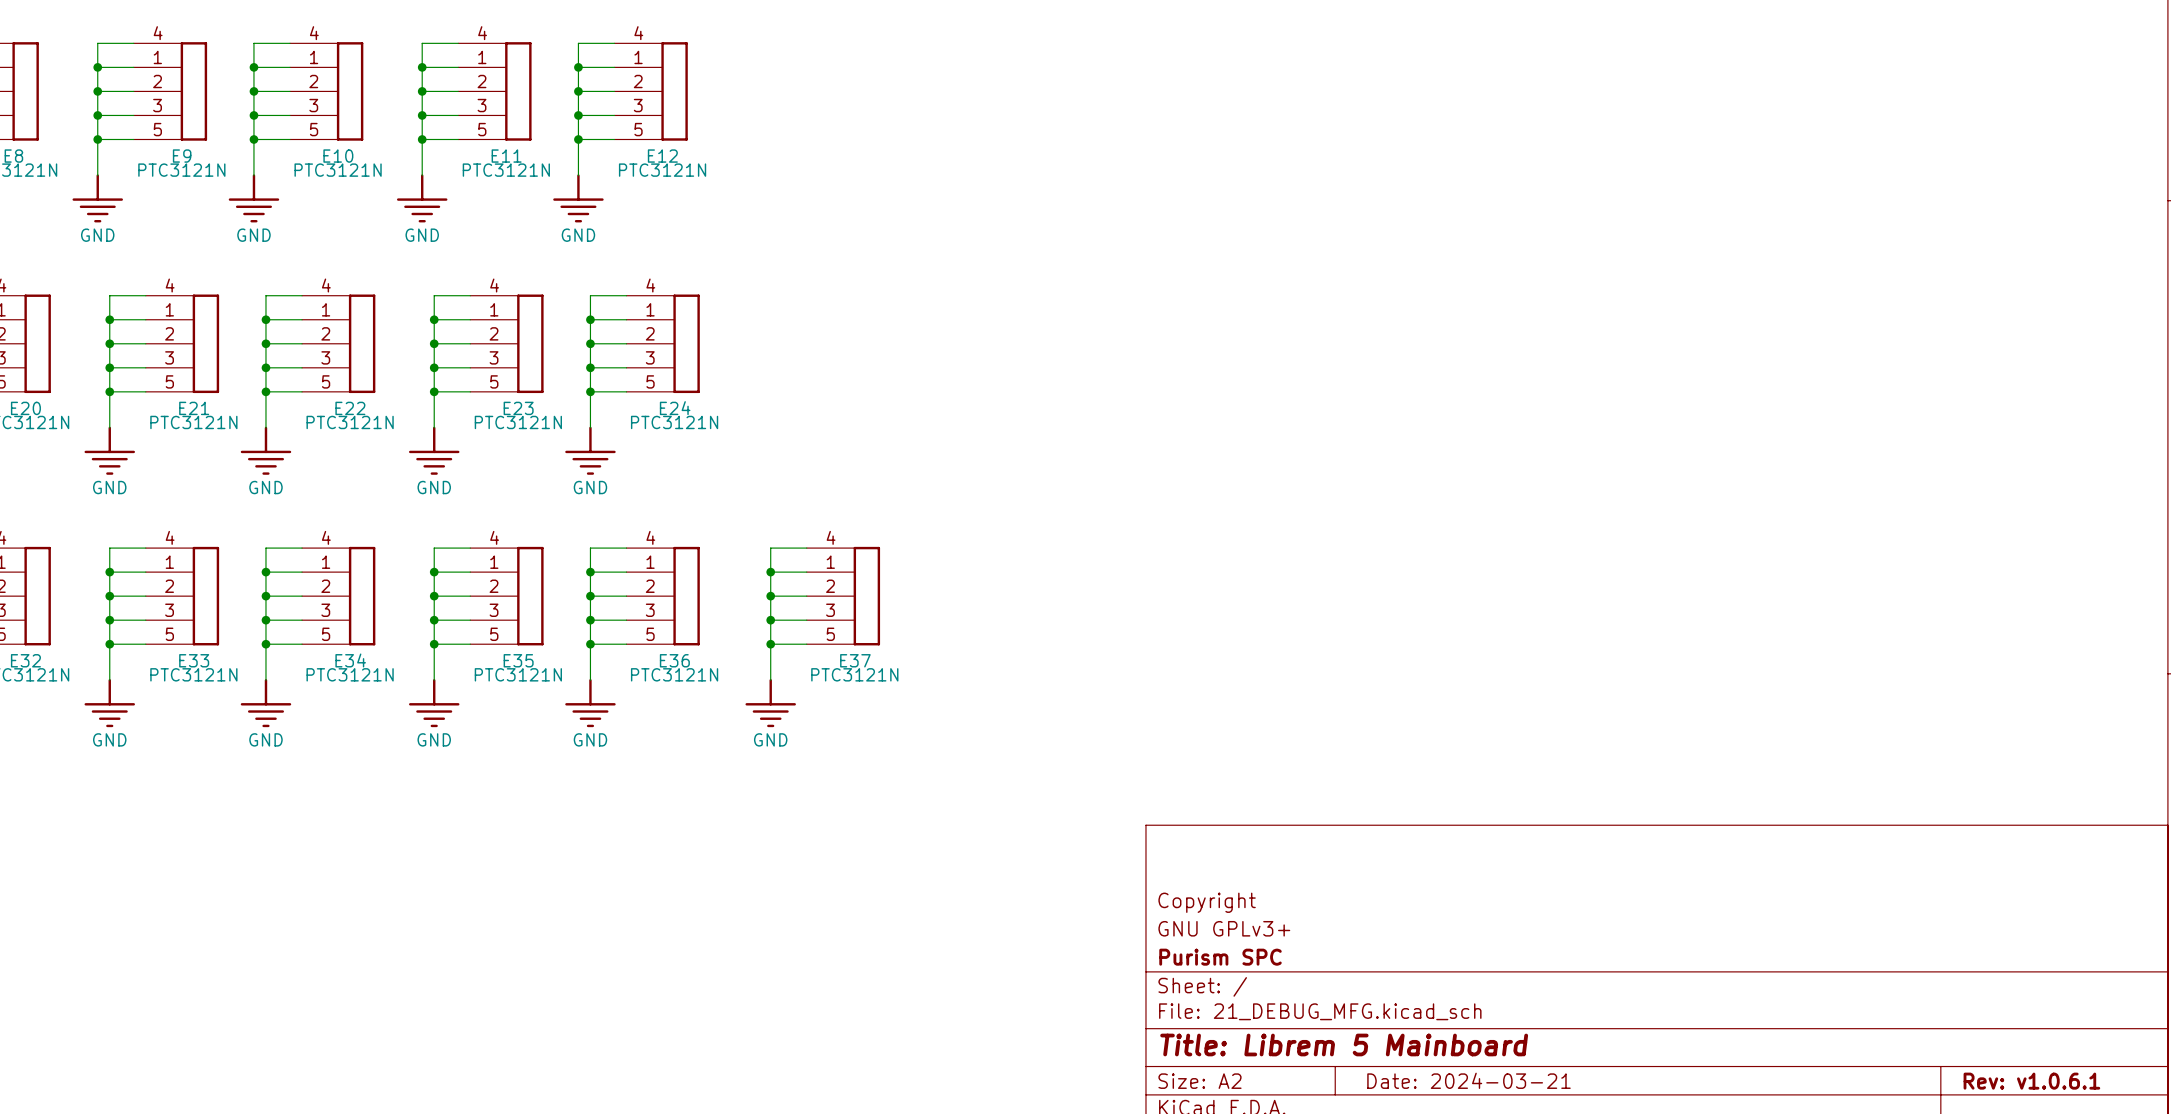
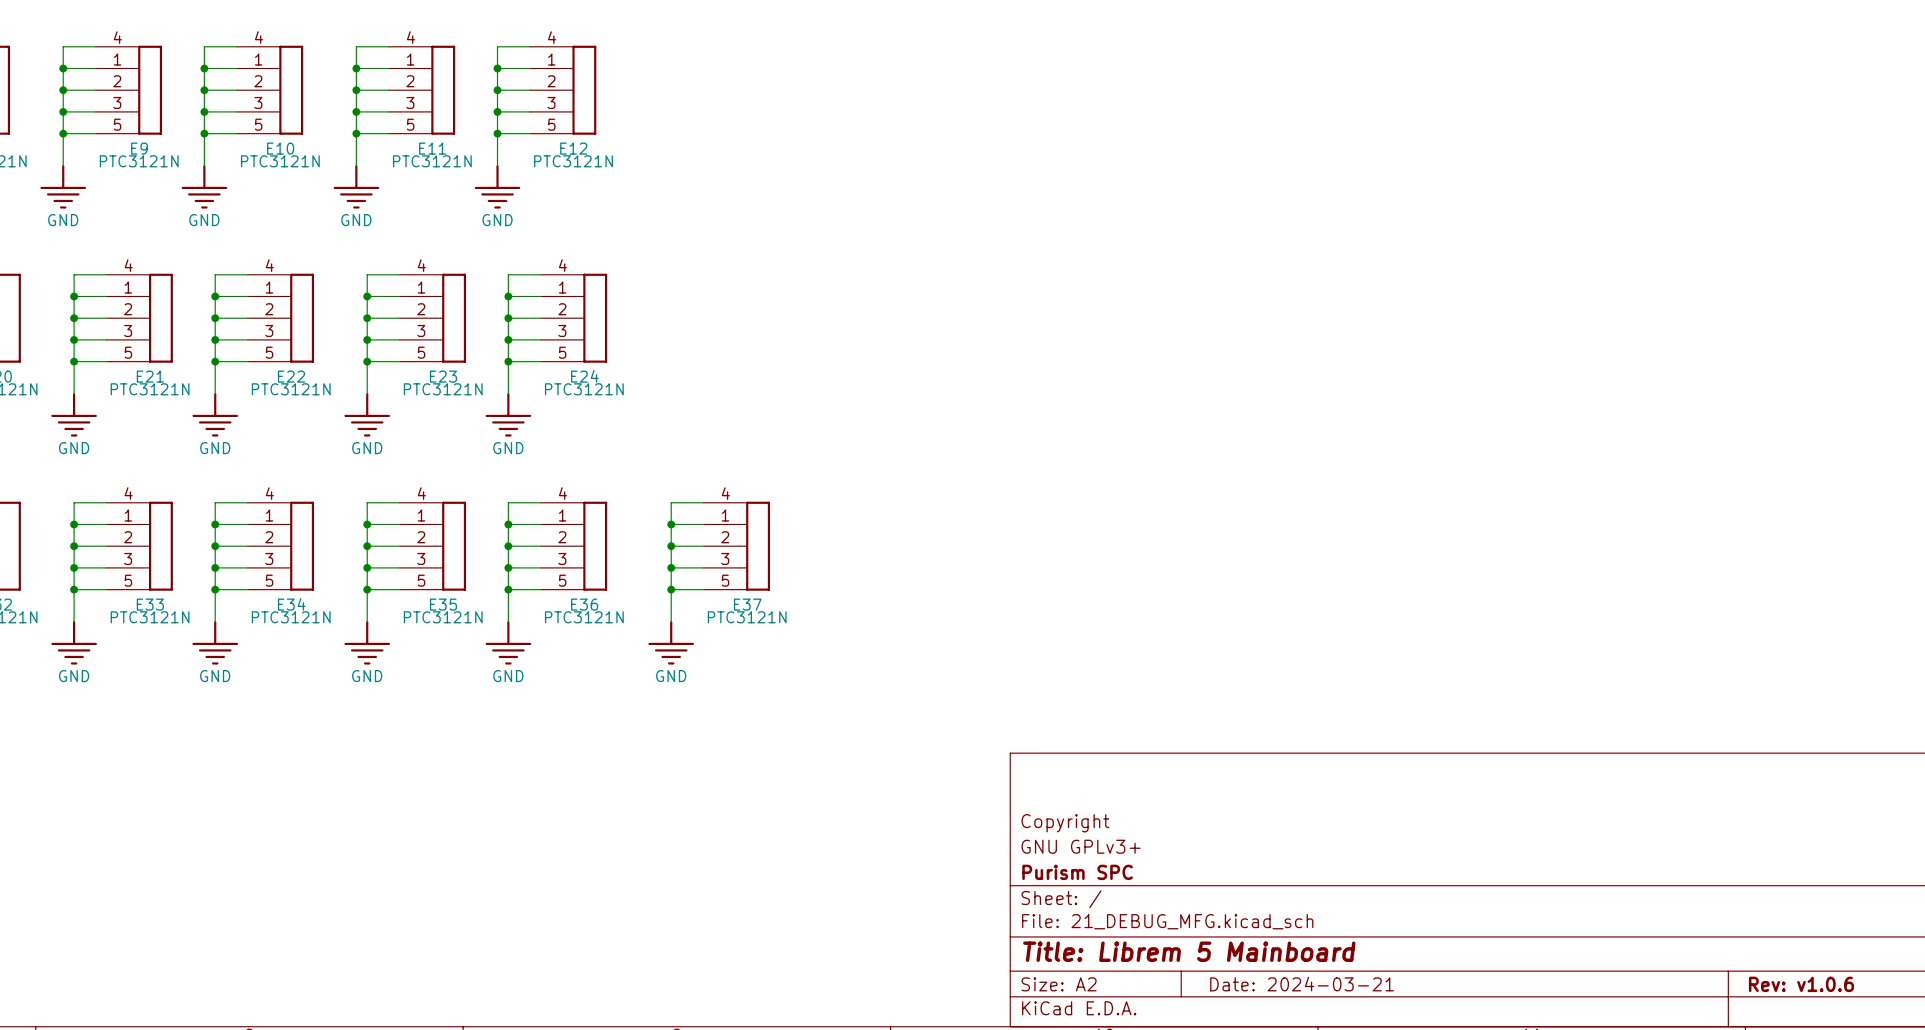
title block: Rev: v1.0.6.1 (2031, 1081) -> Rev: v1.0.6 (1801, 984)

